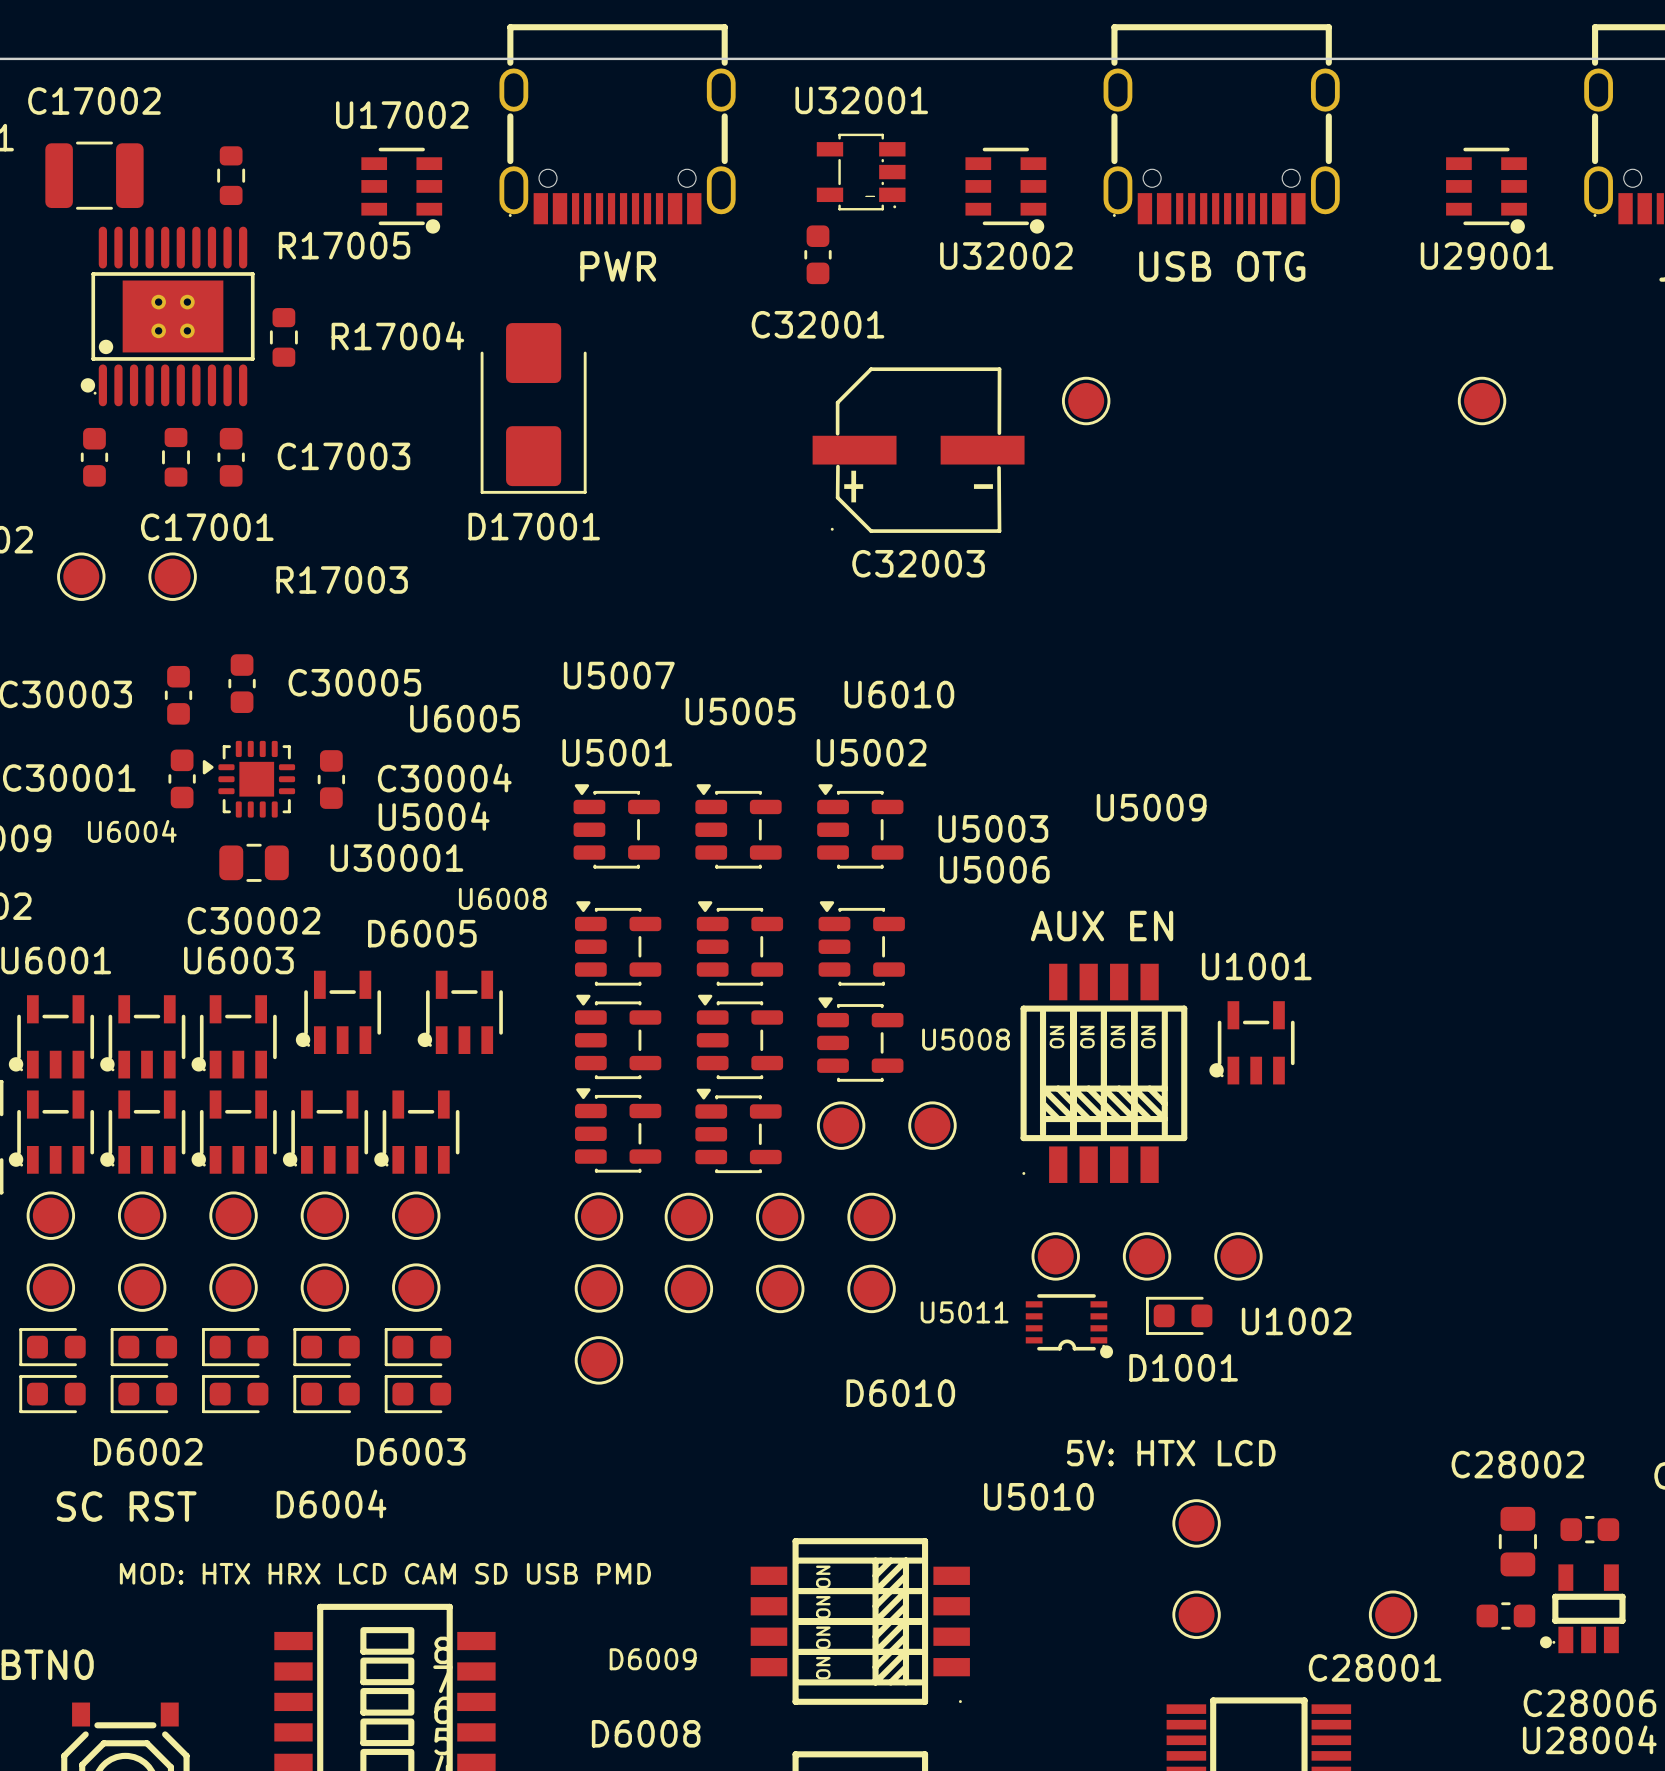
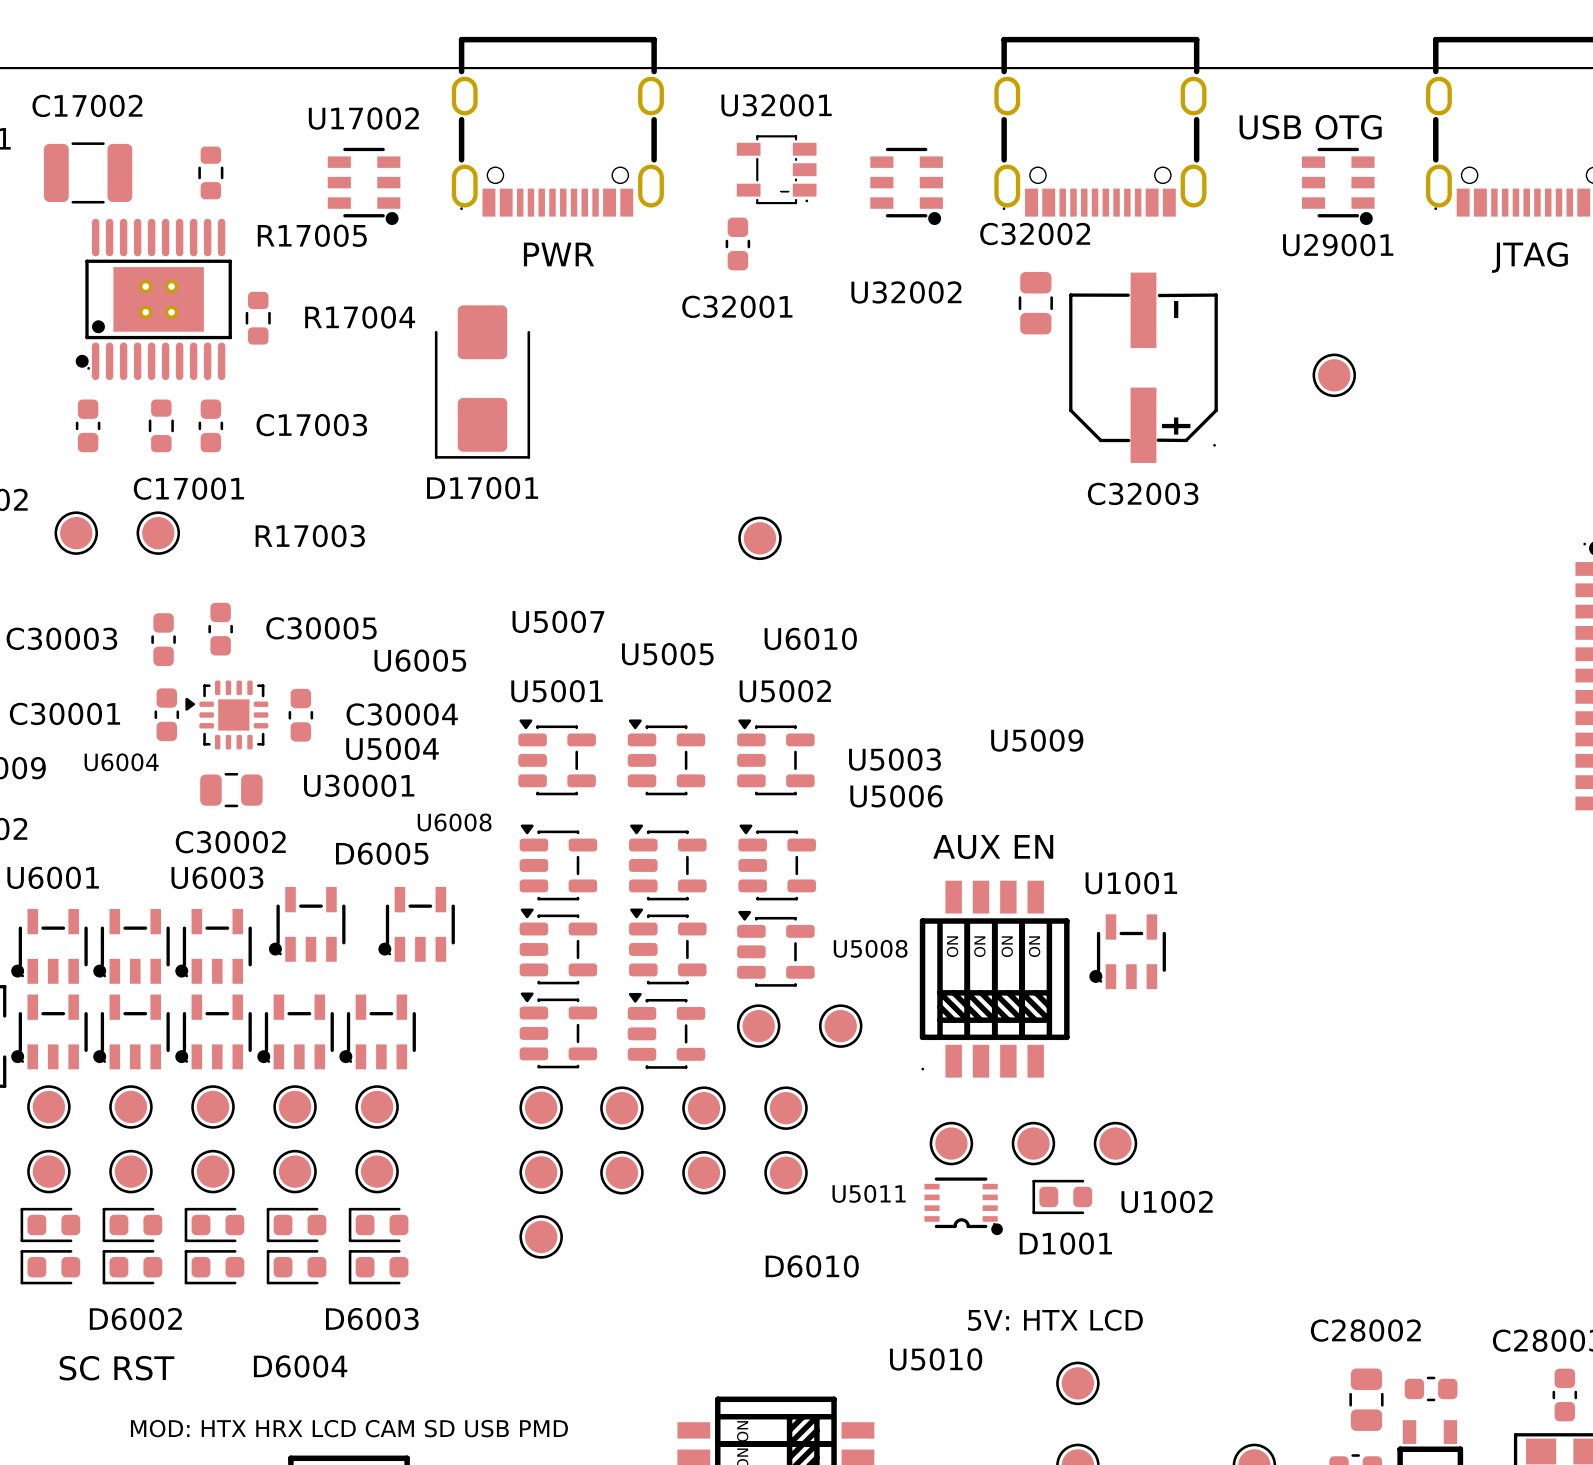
U32002 name position: U32002 (1006, 255) -> U32002 (906, 292)
text position: USB OTG (1222, 266) -> USB OTG (1310, 127)
C32002: none -> (1035, 303)
part position: (1086, 400) -> (759, 538)
C32003 rotation: 0° (918, 450) -> 90° counterclockwise (1143, 367)
C32003 position: (918, 450) -> (1143, 367)

